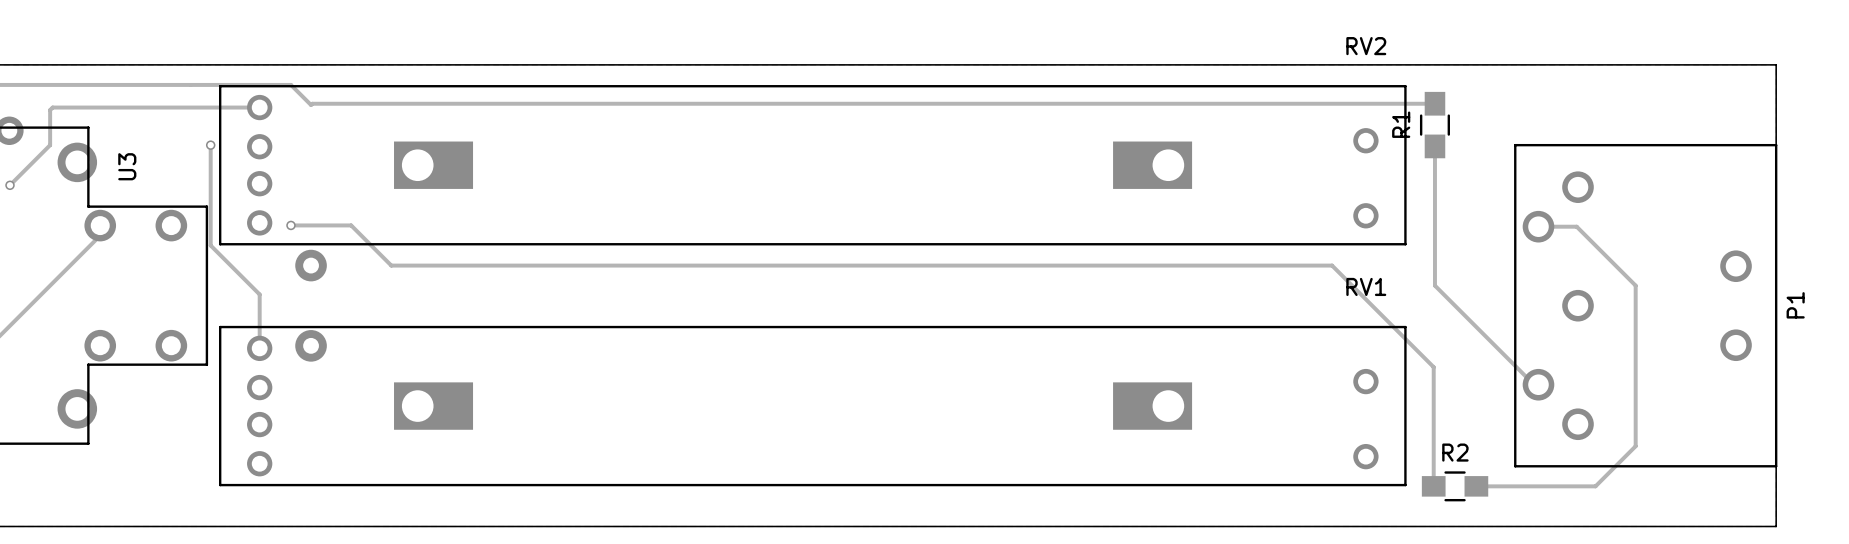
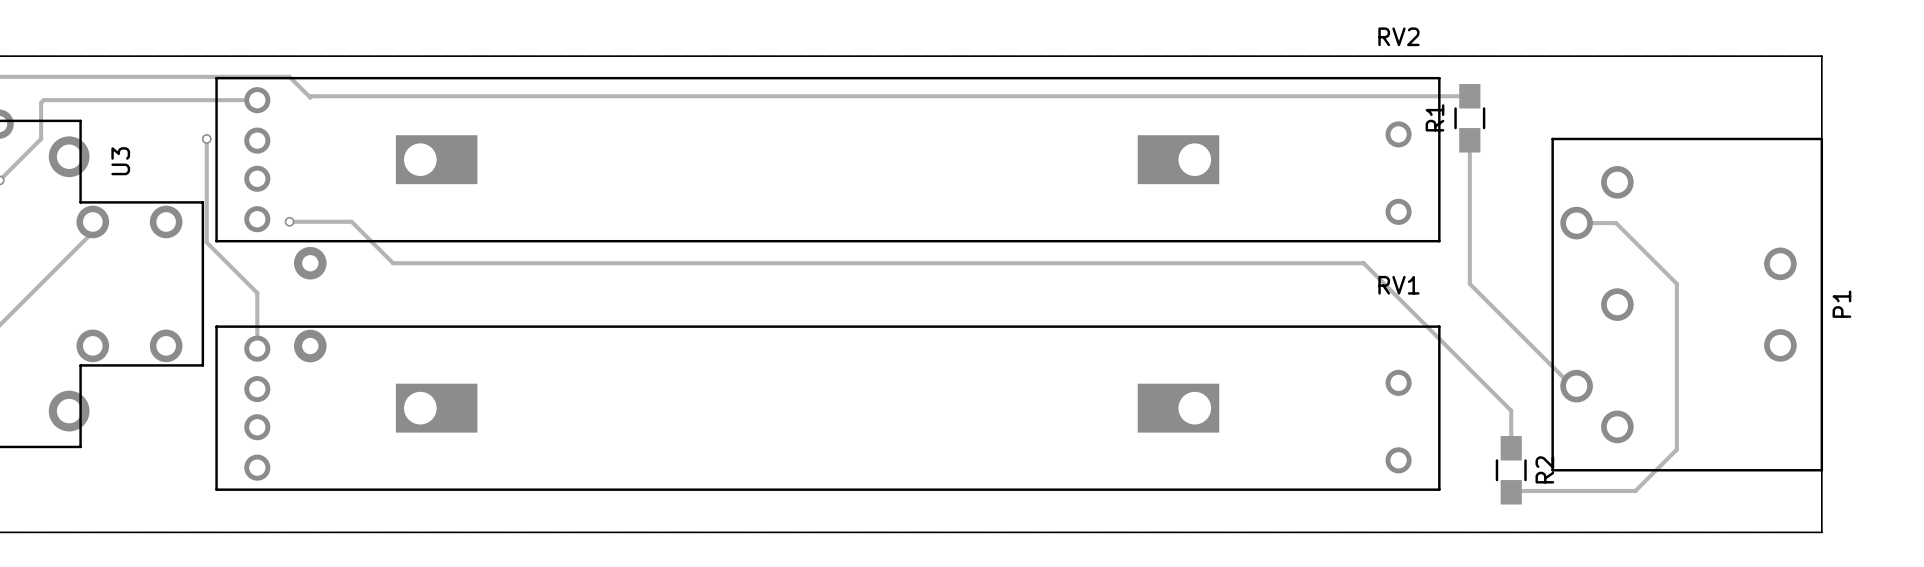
track: (1433, 367) (1433, 486) -> (1468, 368) (1511, 410) (1511, 448)
R2 rotation: 0° (1455, 486) -> 90° clockwise (1511, 470)

